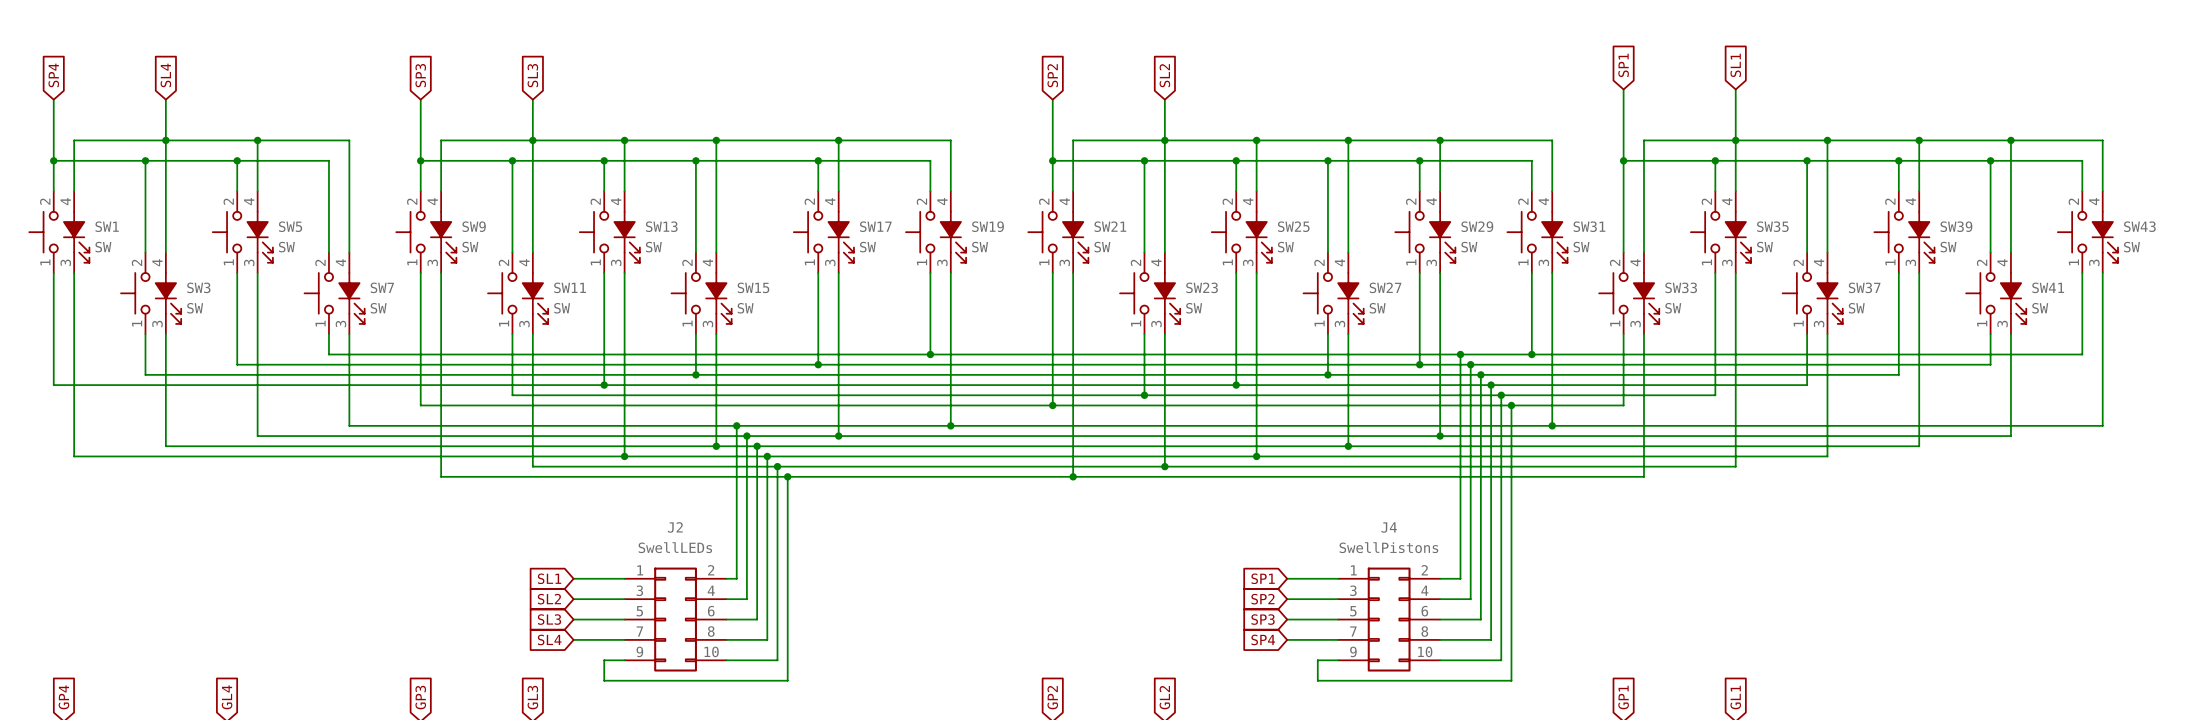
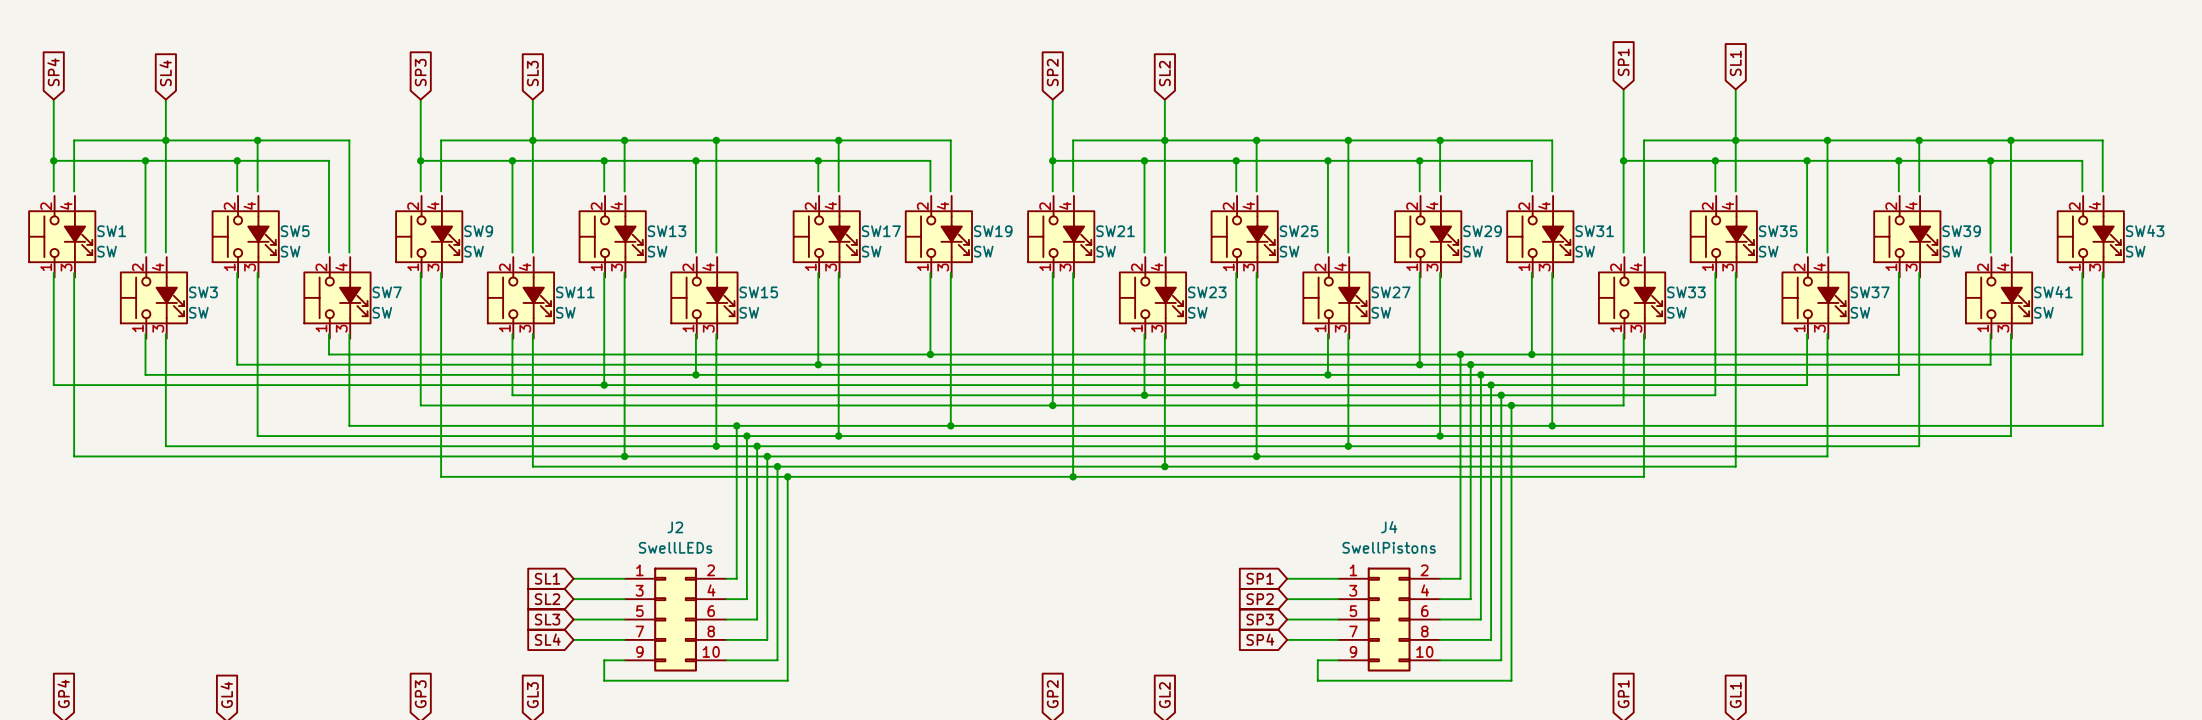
SW1 symbol: [29, 191, 90, 273] -> [29, 195, 96, 278]
SW5 symbol: [212, 191, 273, 273] -> [212, 195, 279, 278]
SW9 symbol: [396, 191, 457, 273] -> [396, 195, 463, 278]
SW13 symbol: [579, 191, 640, 273] -> [579, 195, 646, 278]
SW17 symbol: [793, 191, 854, 273] -> [793, 195, 860, 278]
SW19 symbol: [905, 191, 967, 273] -> [905, 195, 973, 278]
SW21 symbol: [1028, 191, 1089, 273] -> [1028, 195, 1095, 278]
SW25 symbol: [1211, 191, 1272, 273] -> [1211, 195, 1278, 278]
SW29 symbol: [1395, 191, 1456, 273] -> [1395, 195, 1462, 278]
SW31 symbol: [1507, 191, 1568, 273] -> [1507, 195, 1574, 278]
SW35 symbol: [1690, 191, 1752, 273] -> [1690, 195, 1757, 278]
SW39 symbol: [1874, 191, 1935, 273] -> [1874, 195, 1941, 278]
SW43 symbol: [2057, 191, 2119, 273] -> [2057, 195, 2124, 278]
SW3 symbol: [121, 252, 182, 335] -> [120, 257, 188, 339]
SW7 symbol: [304, 252, 365, 335] -> [304, 257, 371, 339]
SW11 symbol: [488, 252, 549, 335] -> [487, 257, 555, 339]
SW15 symbol: [671, 252, 732, 335] -> [671, 257, 738, 339]
SW23 symbol: [1120, 252, 1181, 335] -> [1119, 257, 1187, 339]
SW27 symbol: [1303, 252, 1364, 335] -> [1303, 257, 1370, 339]
SW33 symbol: [1599, 252, 1660, 335] -> [1598, 257, 1666, 339]
SW37 symbol: [1782, 252, 1843, 335] -> [1782, 257, 1849, 339]
SW41 symbol: [1966, 252, 2027, 335] -> [1965, 257, 2033, 339]

